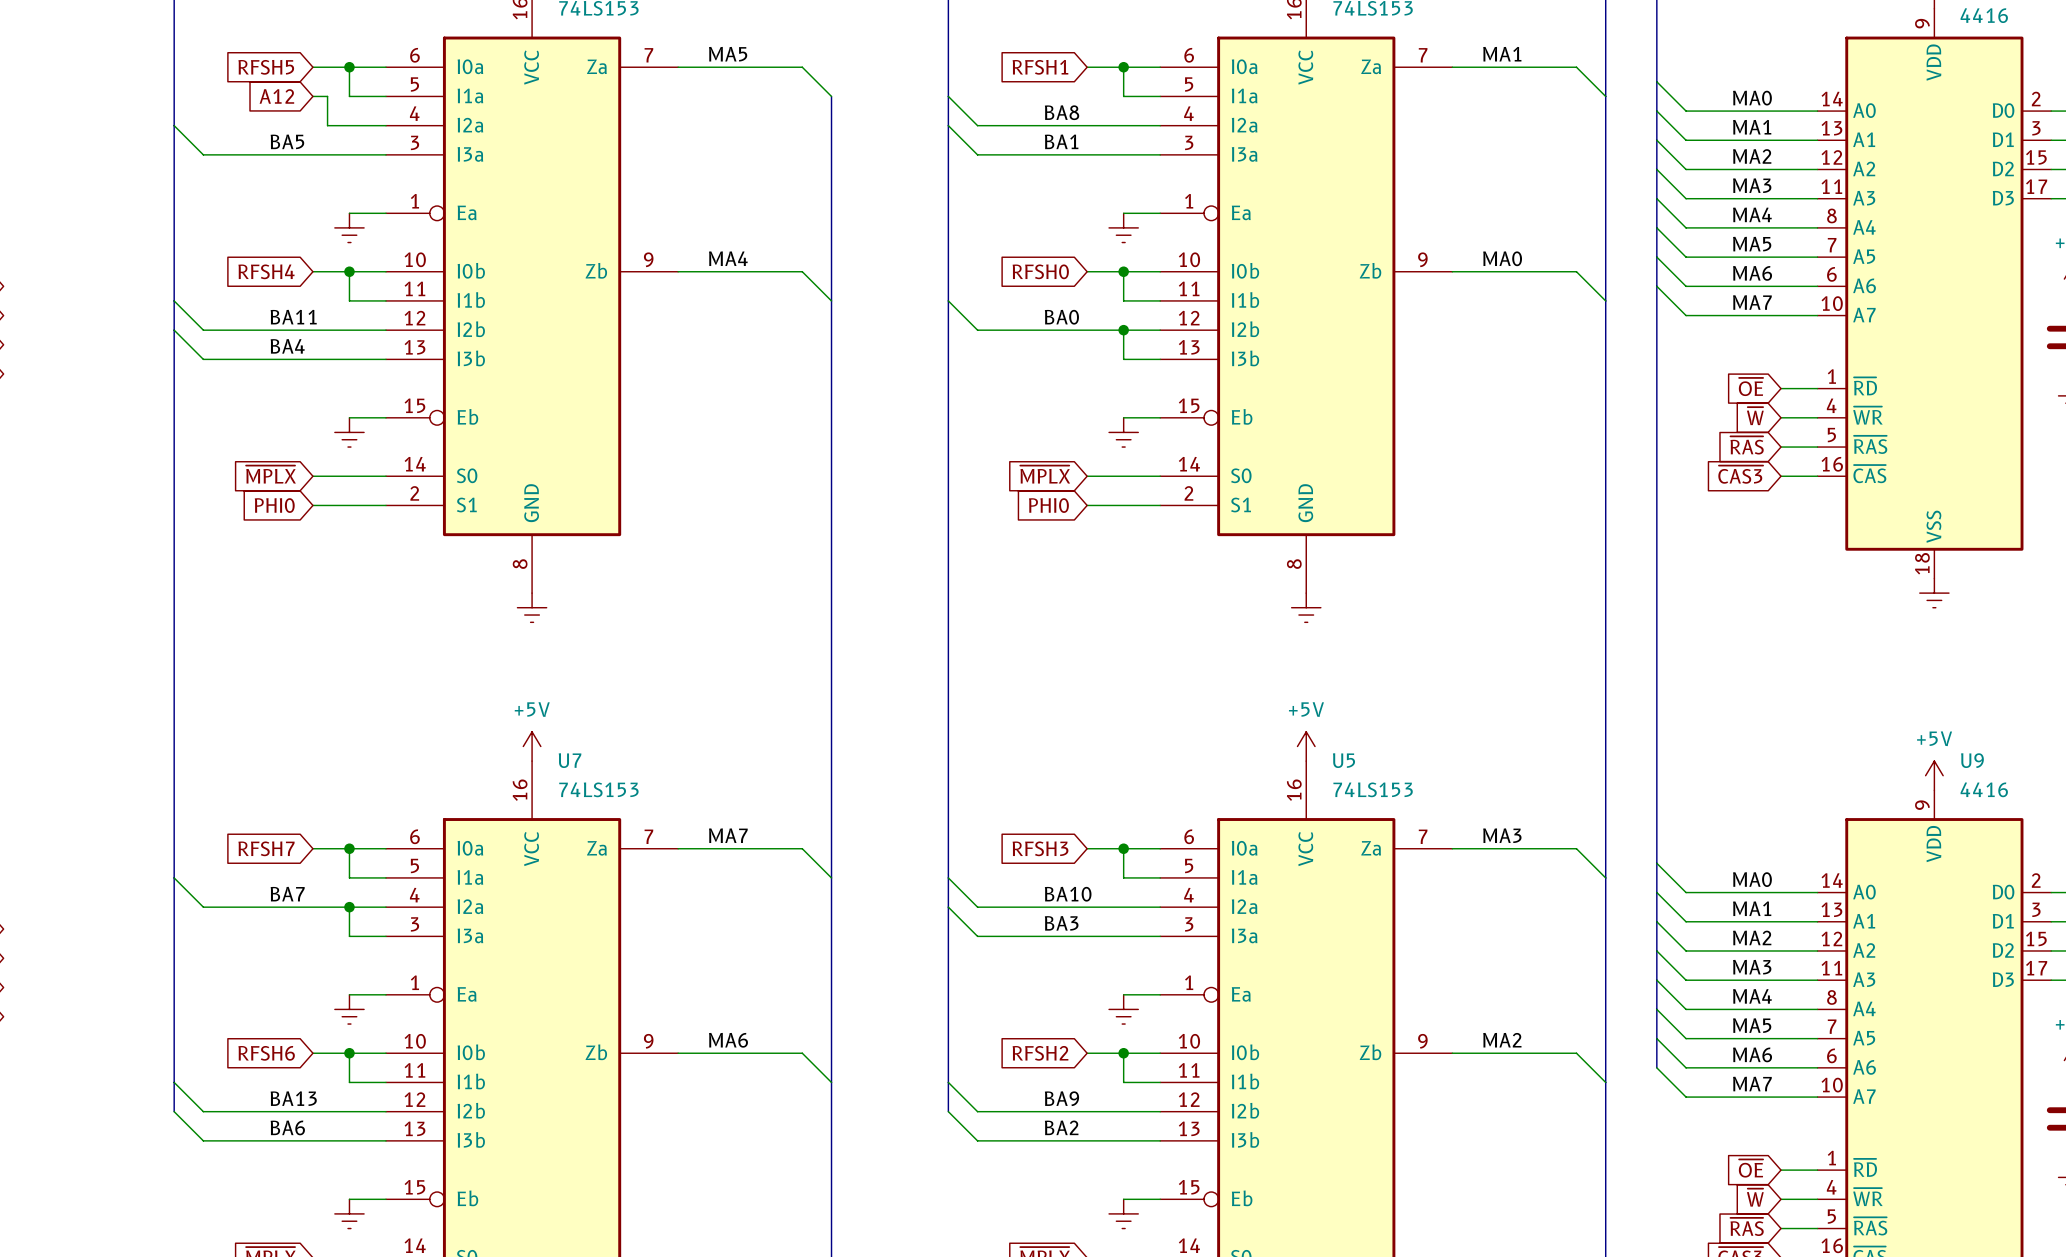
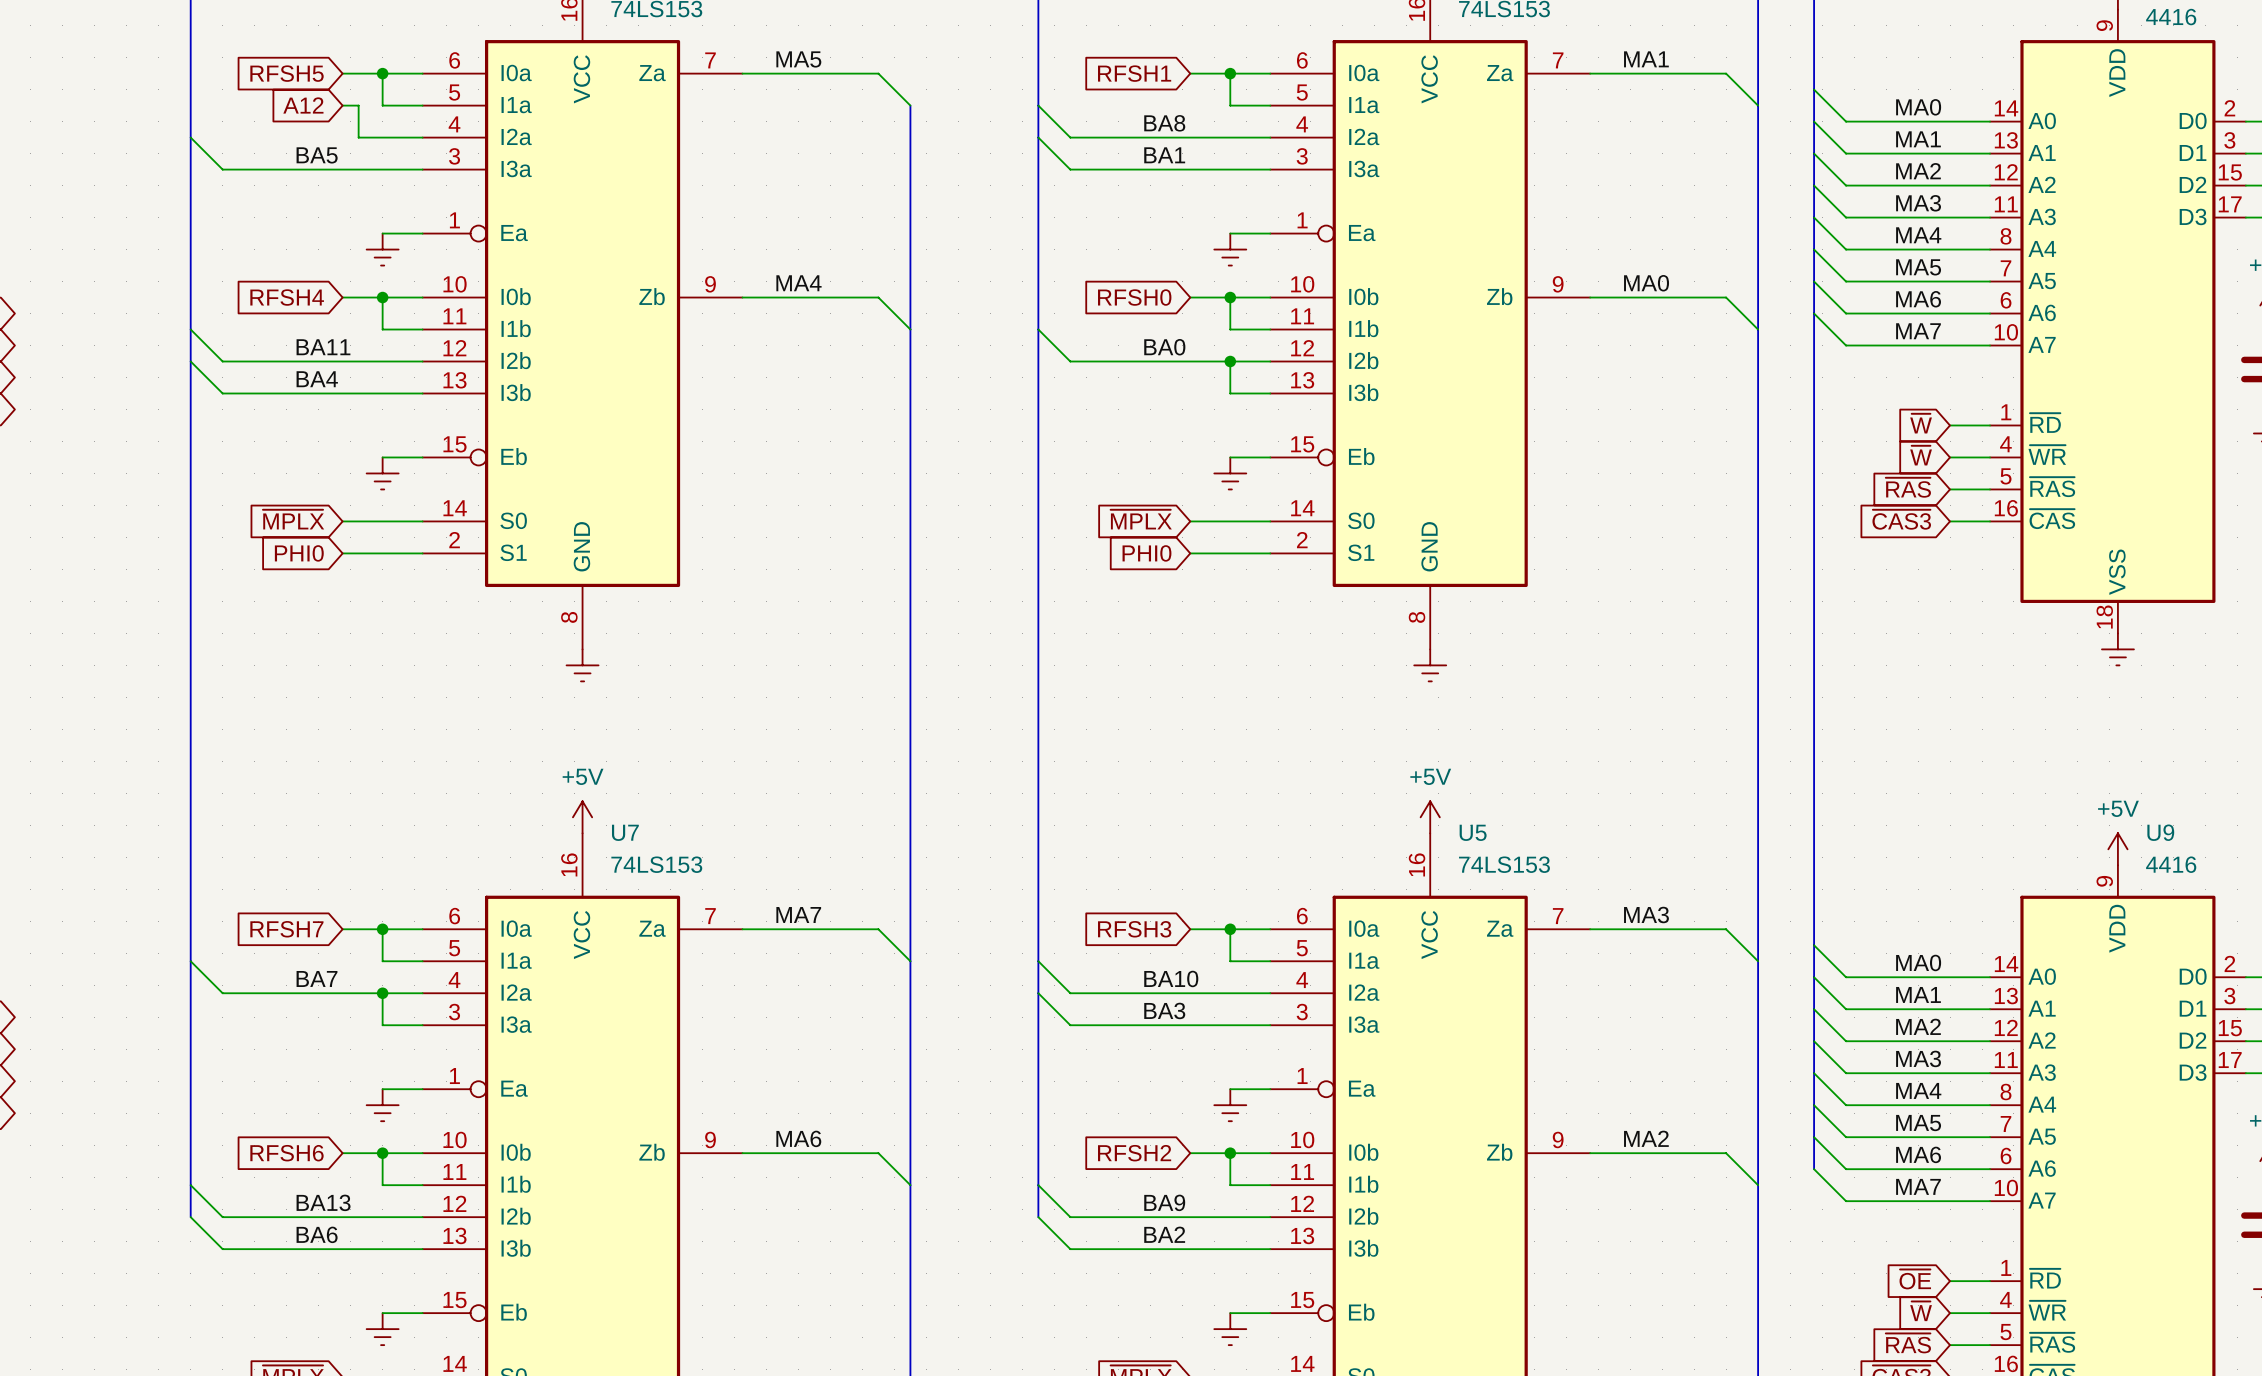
global label: ~{OE} (1750, 387) -> ~{W} (1921, 423)

